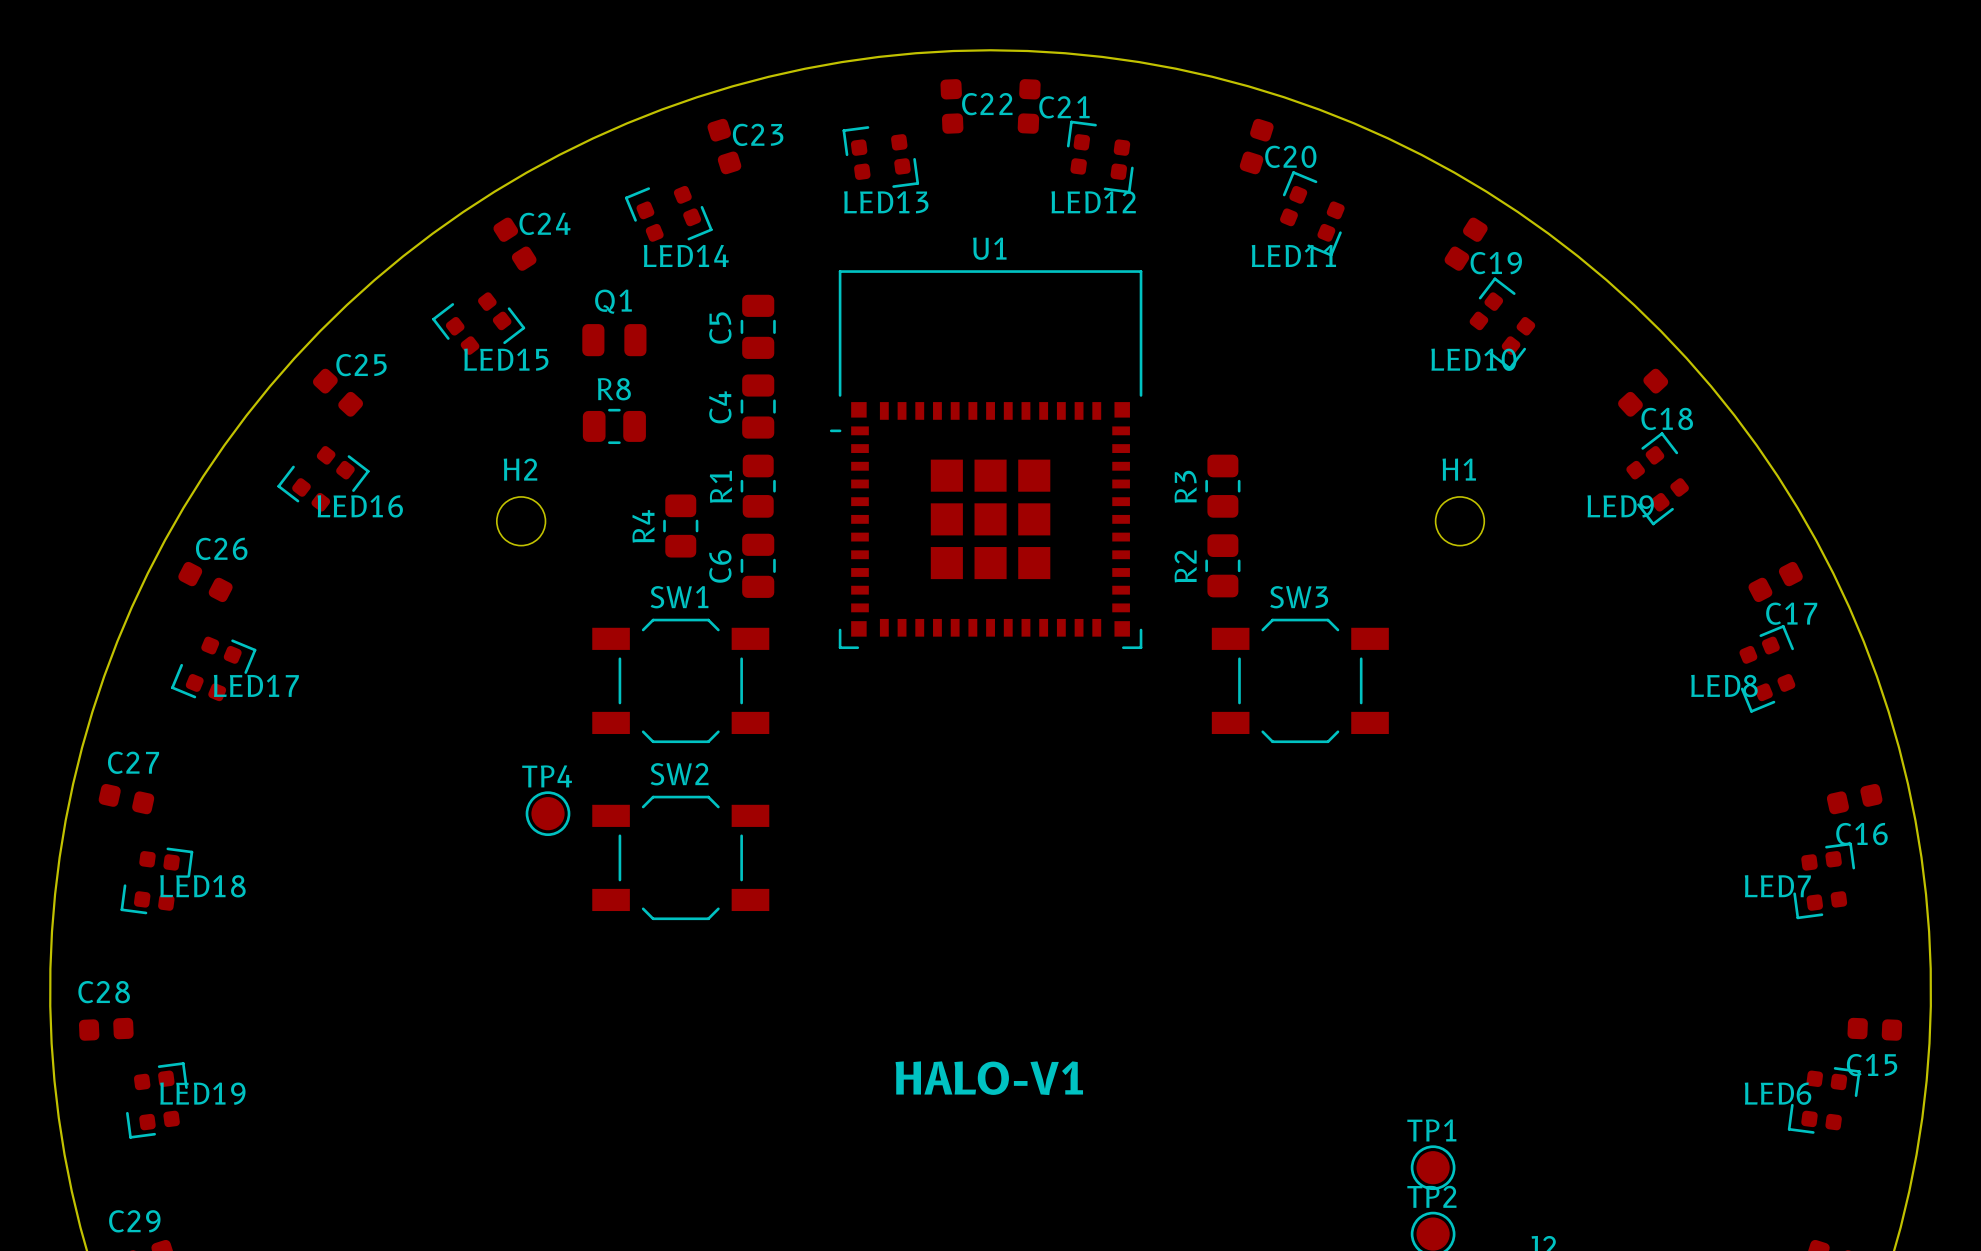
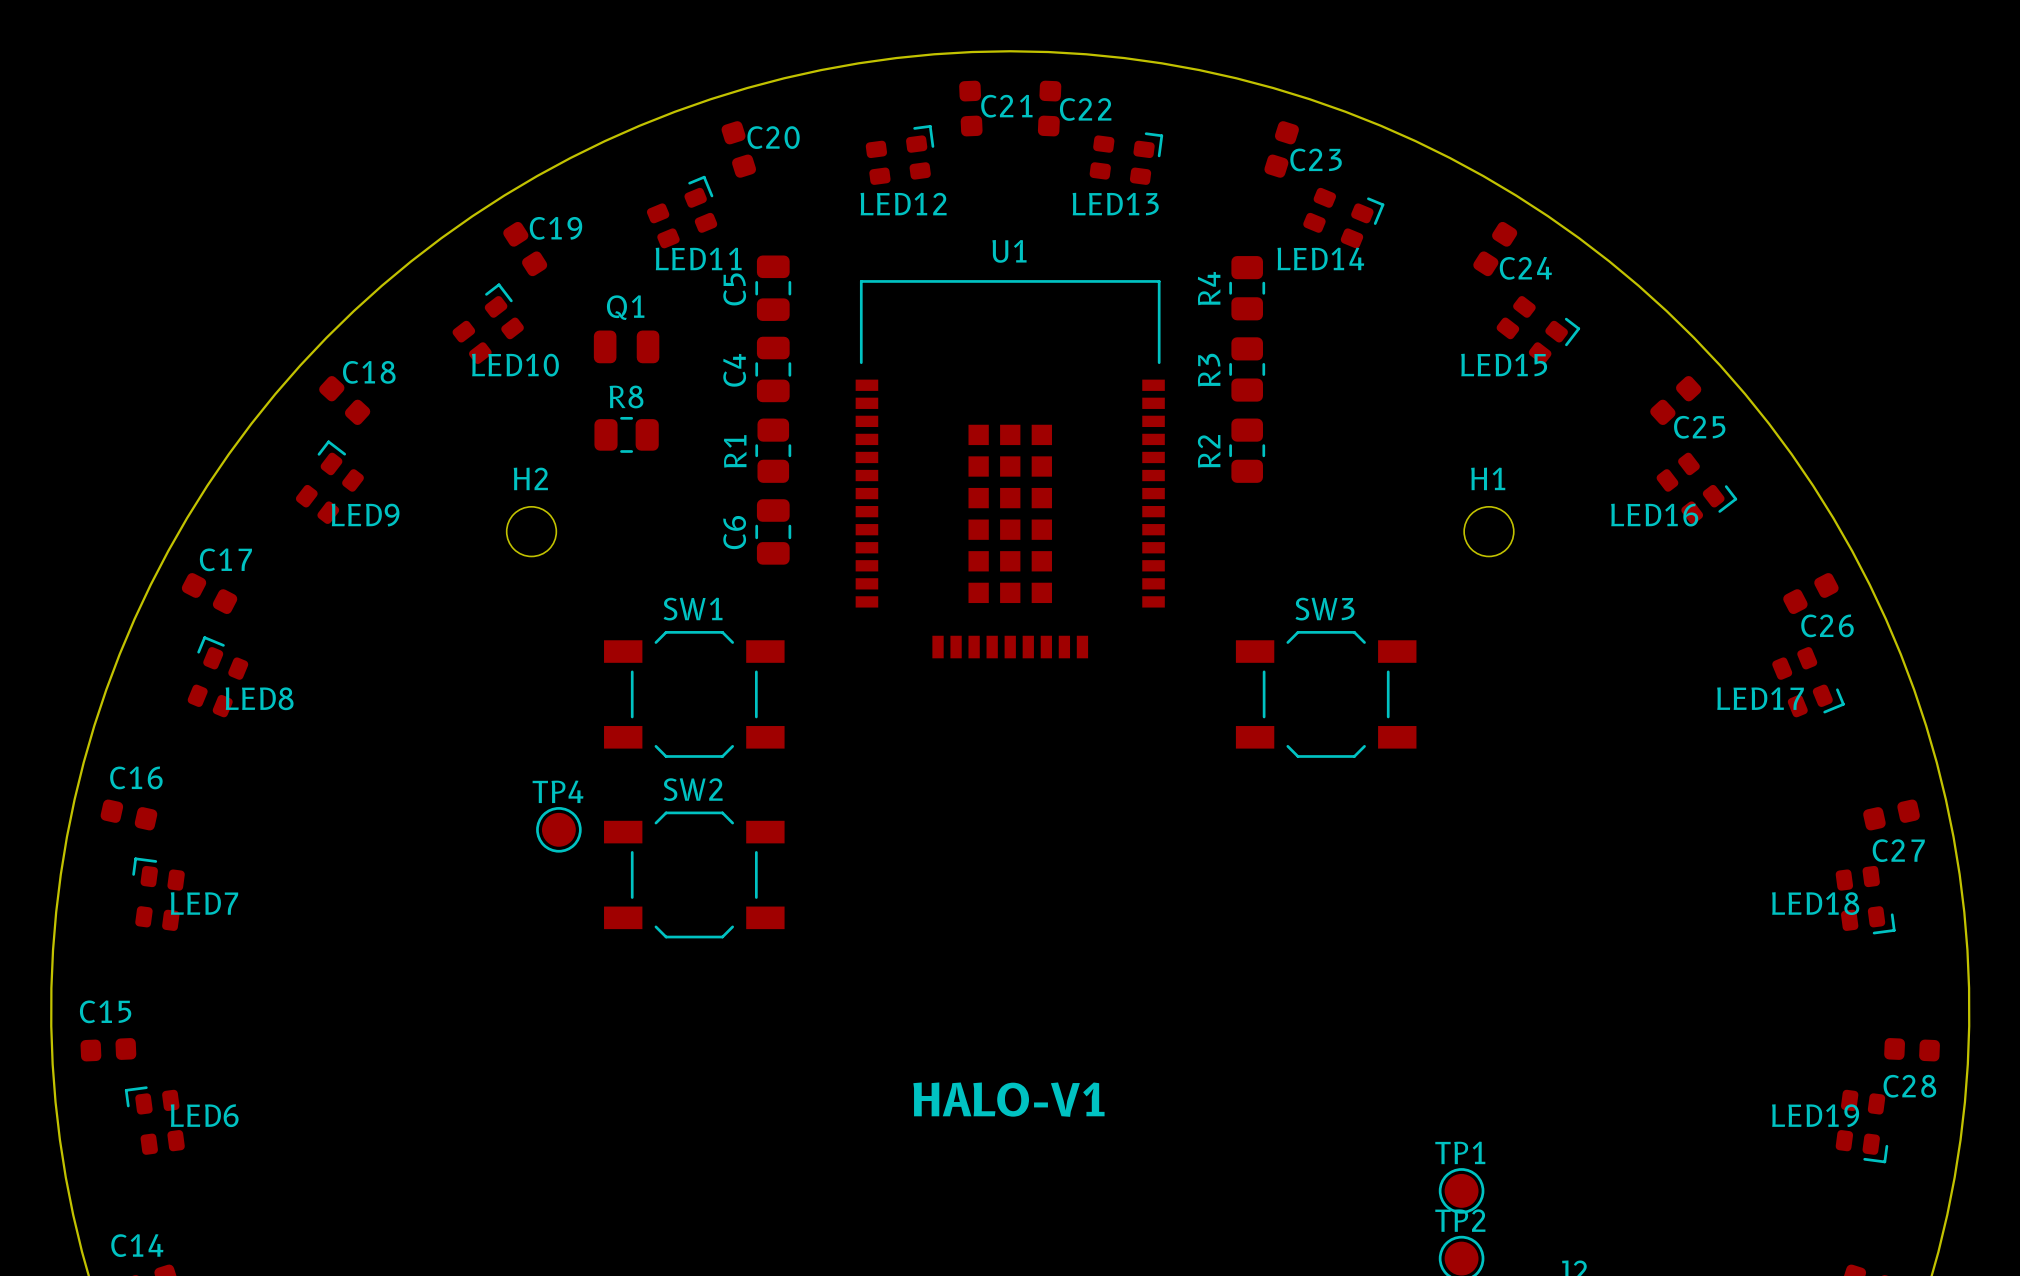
C22 name: C22 (987, 104) -> C21 (1006, 106)
C21 name: C21 (1064, 107) -> C22 (1085, 109)
LED12 footprint: [1066, 120, 1134, 194] -> [865, 125, 935, 185]
LED13 footprint: [842, 126, 920, 188] -> [1089, 132, 1164, 185]
C23 name: C23 (758, 134) -> C20 (773, 137)
C20 name: C20 (1290, 156) -> C23 (1316, 159)
LED11 footprint: [1280, 171, 1345, 257] -> [646, 175, 718, 249]
LED14 footprint: [624, 185, 713, 242] -> [1303, 187, 1385, 249]
C24 name: C24 (544, 223) -> C19 (555, 228)
C19 name: C19 (1496, 263) -> C24 (1525, 268)
U1 footprint: [829, 270, 1143, 650] -> [855, 280, 1165, 659]
LED10 footprint: [1469, 277, 1536, 370] -> [452, 283, 524, 364]
LED15 footprint: [432, 292, 526, 355] -> [1496, 296, 1581, 364]
C5 position: (758, 326) -> (773, 288)
LED15 name position: LED15 (506, 359) -> LED15 (1504, 364)
LED10 name position: LED10 (1473, 359) -> LED10 (515, 365)
C25 name: C25 (361, 365) -> C18 (369, 372)
C4 position: (758, 406) -> (773, 369)
C18 name: C18 (1667, 418) -> C25 (1699, 427)
LED9 footprint: [1626, 432, 1689, 526] -> [295, 440, 364, 524]
LED16 footprint: [277, 446, 370, 512] -> [1656, 452, 1738, 524]
R1 position: (758, 486) -> (773, 450)
R3 position: (1222, 486) -> (1247, 369)
LED16 name position: LED16 (360, 506) -> LED16 (1654, 515)
LED9 name position: LED9 (1620, 506) -> LED9 (365, 515)
R4 position: (680, 526) -> (1247, 288)
C26 name: C26 (221, 548) -> C17 (225, 559)
C6 position: (758, 565) -> (773, 531)
R2 position: (1222, 565) -> (1247, 450)
C17 name: C17 (1791, 613) -> C26 (1827, 625)
LED8 footprint: [1739, 625, 1796, 713] -> [187, 636, 249, 718]
LED17 footprint: [171, 636, 257, 702] -> [1772, 647, 1845, 718]
LED17 name position: LED17 (256, 685) -> LED17 (1760, 698)
LED8 name position: LED8 (1724, 685) -> LED8 (259, 698)
C27 name: C27 (133, 762) -> C16 (136, 777)
C16 name: C16 (1861, 834) -> C27 (1898, 850)
LED7 footprint: [1793, 842, 1856, 920] -> [132, 857, 185, 931]
LED18 footprint: [120, 847, 194, 915] -> [1835, 865, 1896, 935]
LED18 name position: LED18 (202, 886) -> LED18 (1815, 903)
LED7 name position: LED7 (1777, 886) -> LED7 (204, 903)
C28 name: C28 (104, 992) -> C15 (105, 1011)
LED19 footprint: [126, 1062, 188, 1139] -> [1835, 1089, 1889, 1164]
C15 name: C15 (1872, 1065) -> C28 (1909, 1086)
LED6 footprint: [1787, 1067, 1861, 1134] -> [124, 1086, 185, 1155]
LED19 name position: LED19 (202, 1093) -> LED19 (1815, 1115)
LED6 name position: LED6 (1778, 1093) -> LED6 (204, 1115)
C29 name: C29 (134, 1221) -> C14 (137, 1245)

